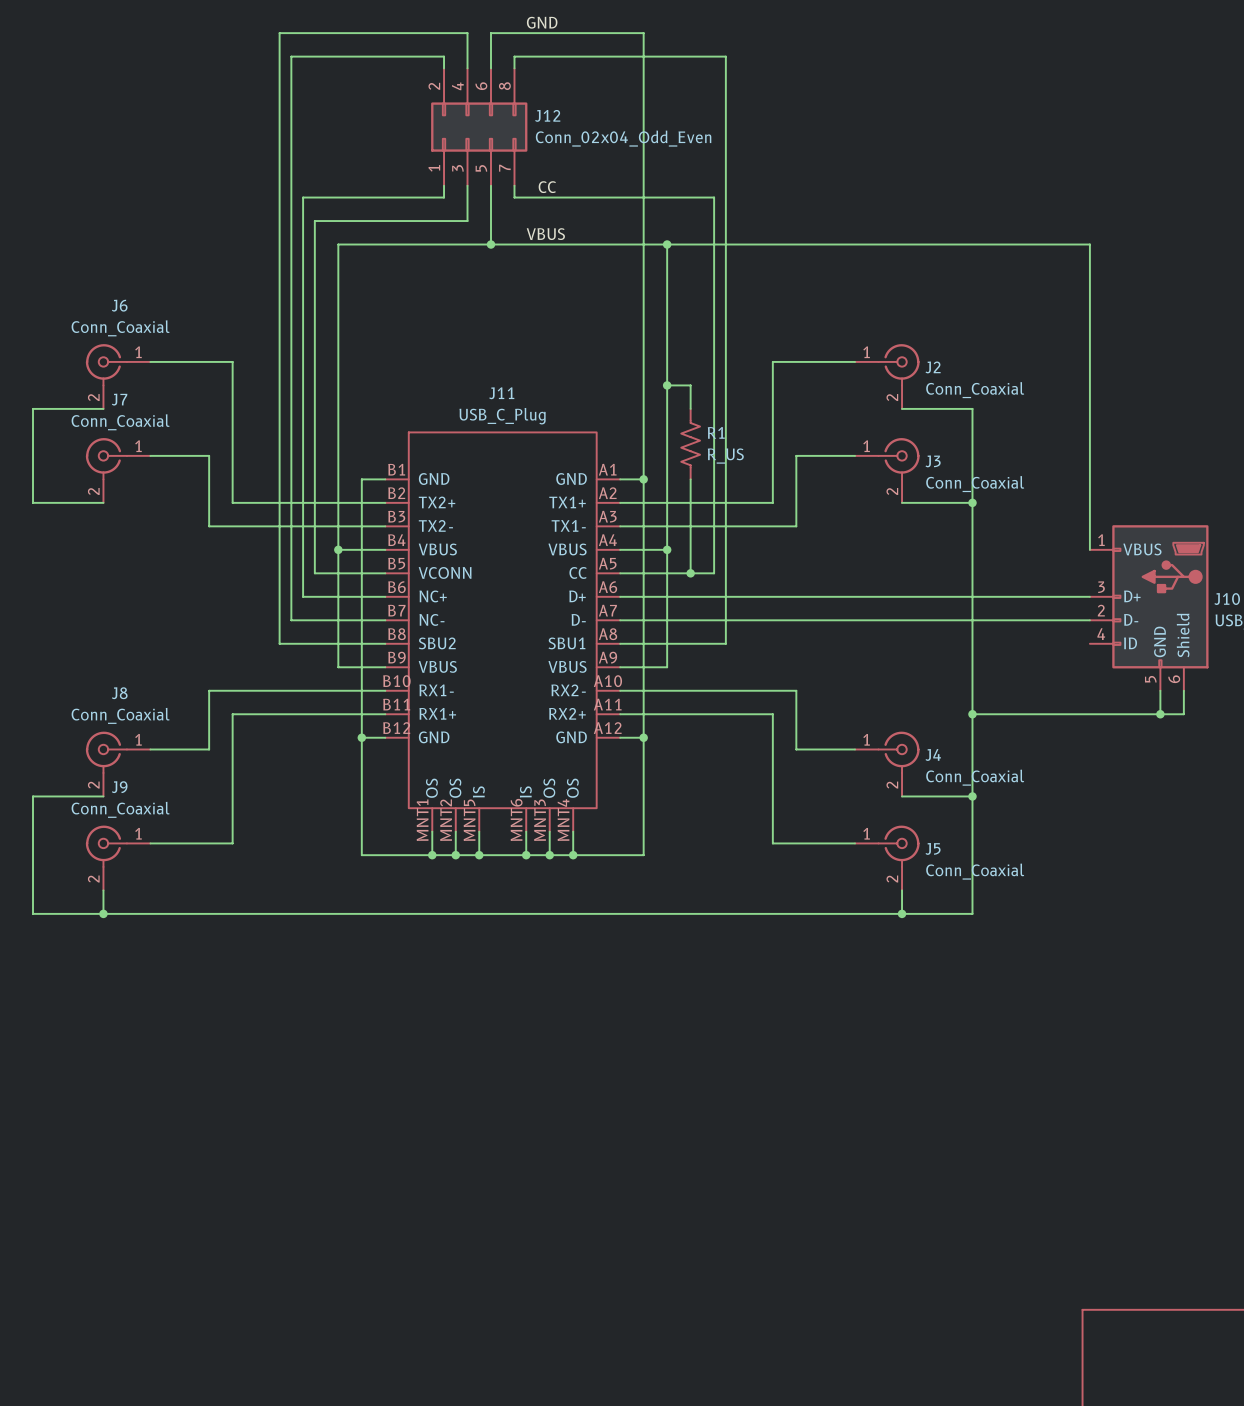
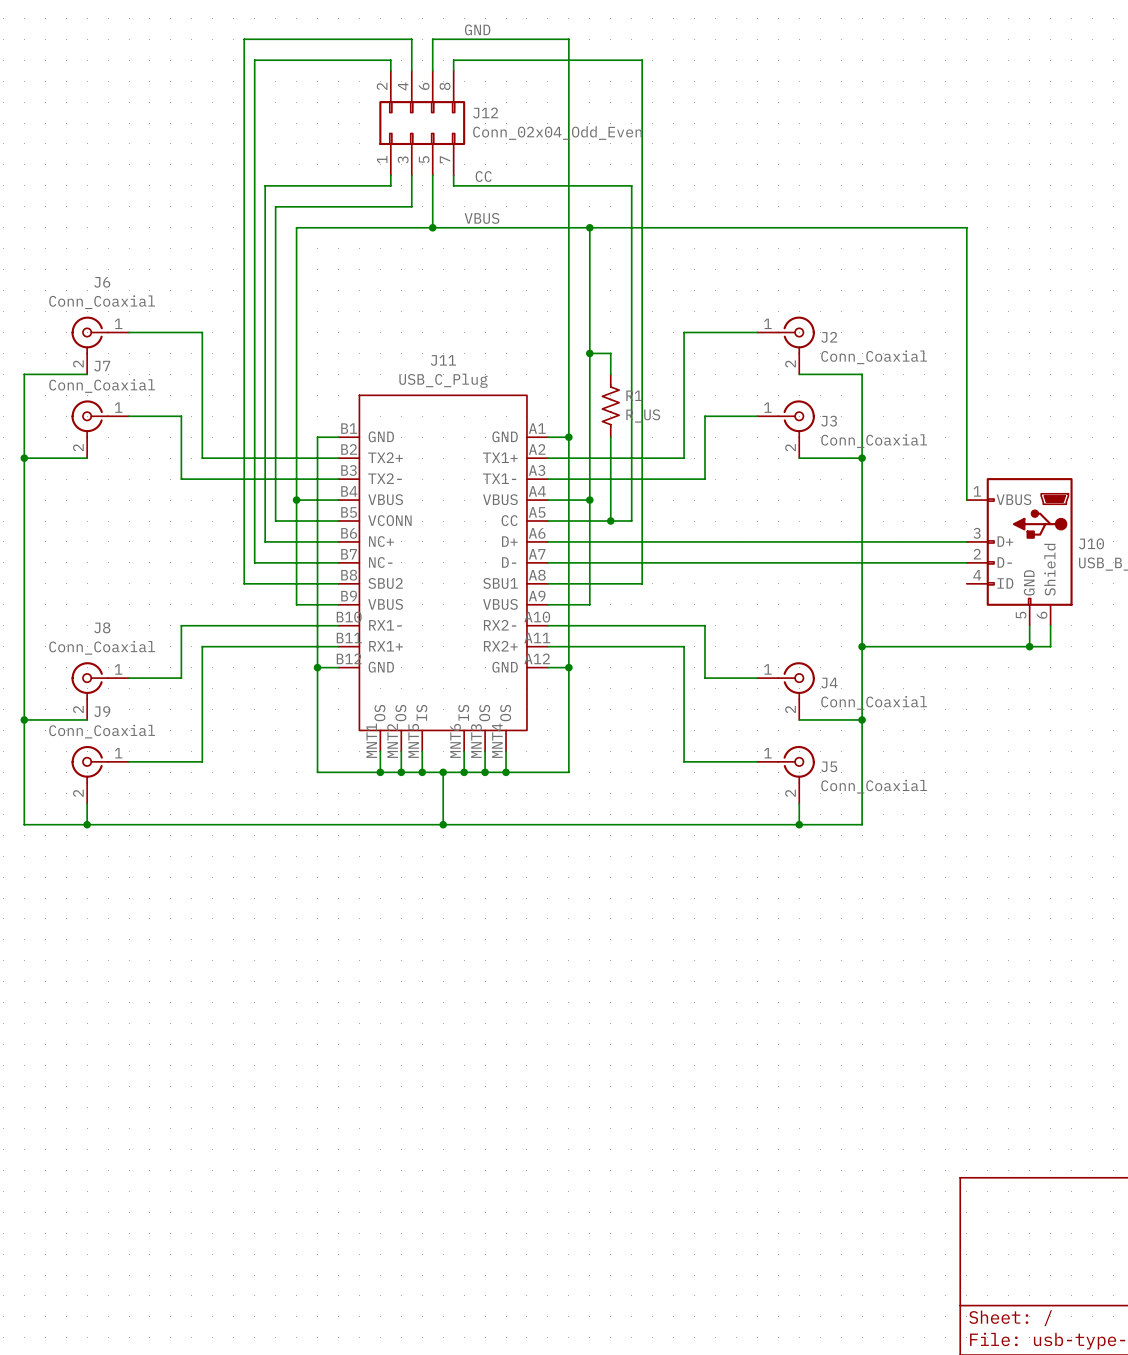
wire: none -> (24, 458) (24, 719)
junction: none -> (24, 458)
junction: none -> (24, 719)
wire: none -> (443, 772) (443, 824)
junction: none -> (443, 772)
junction: none -> (443, 824)

